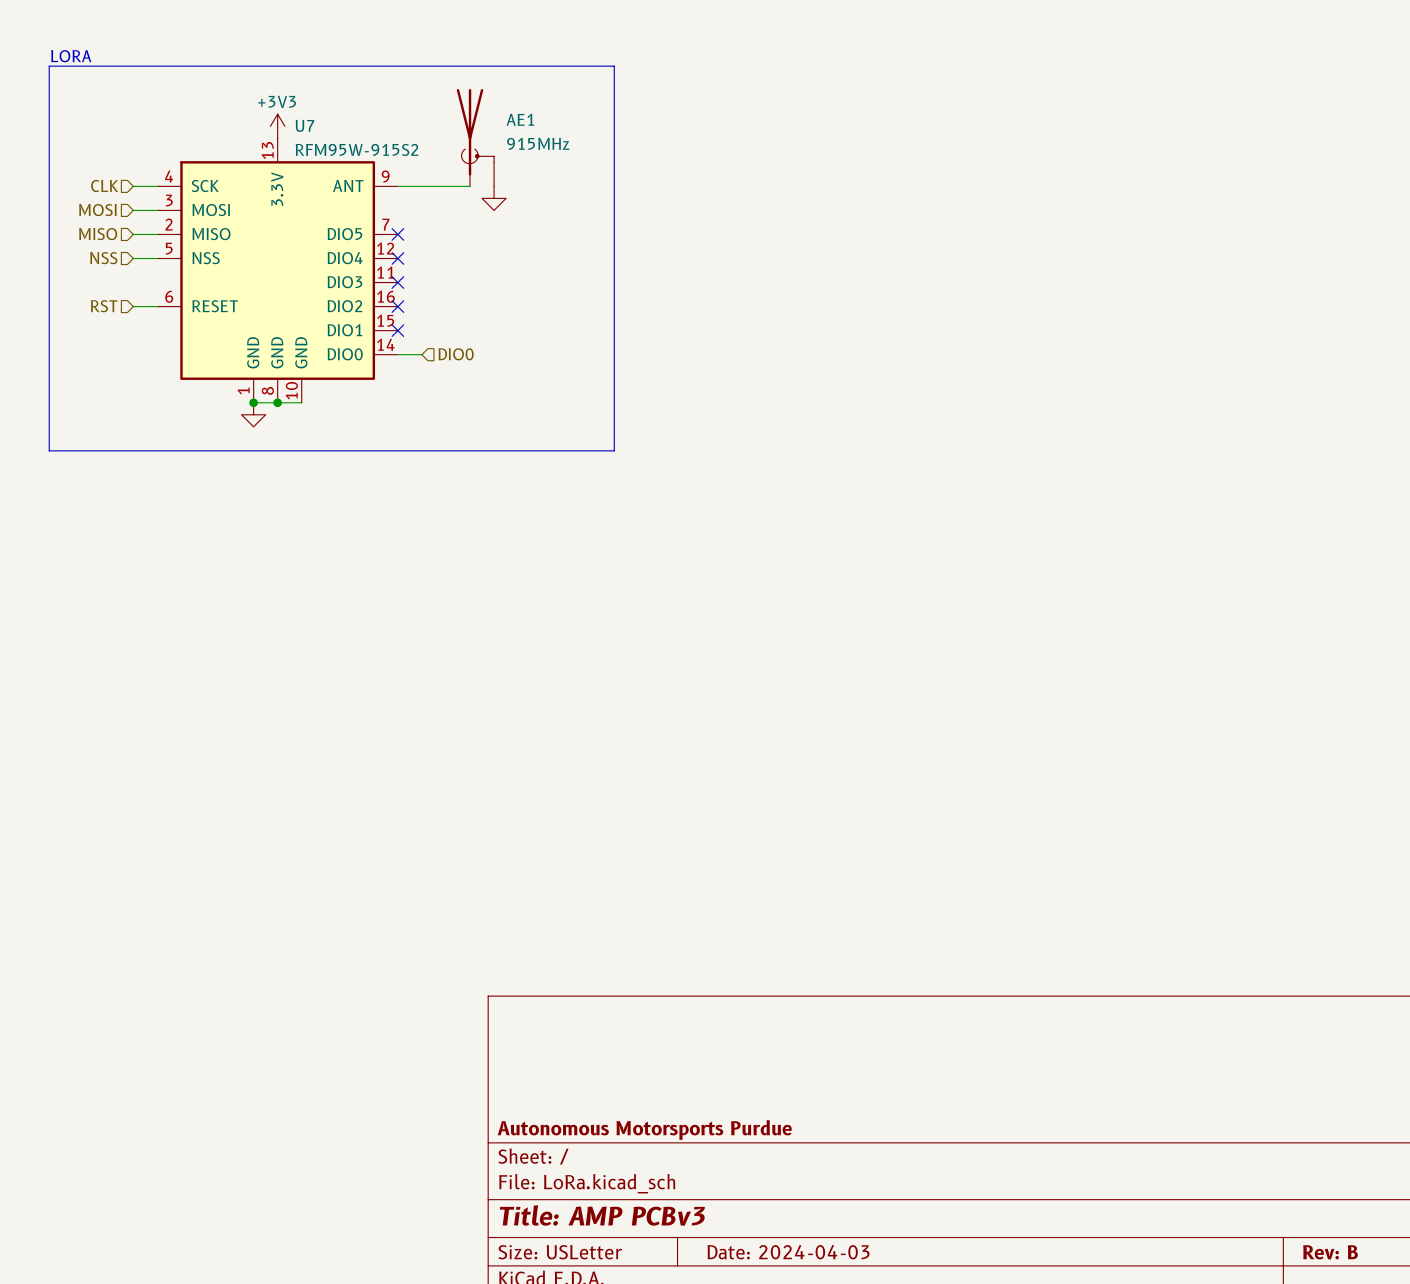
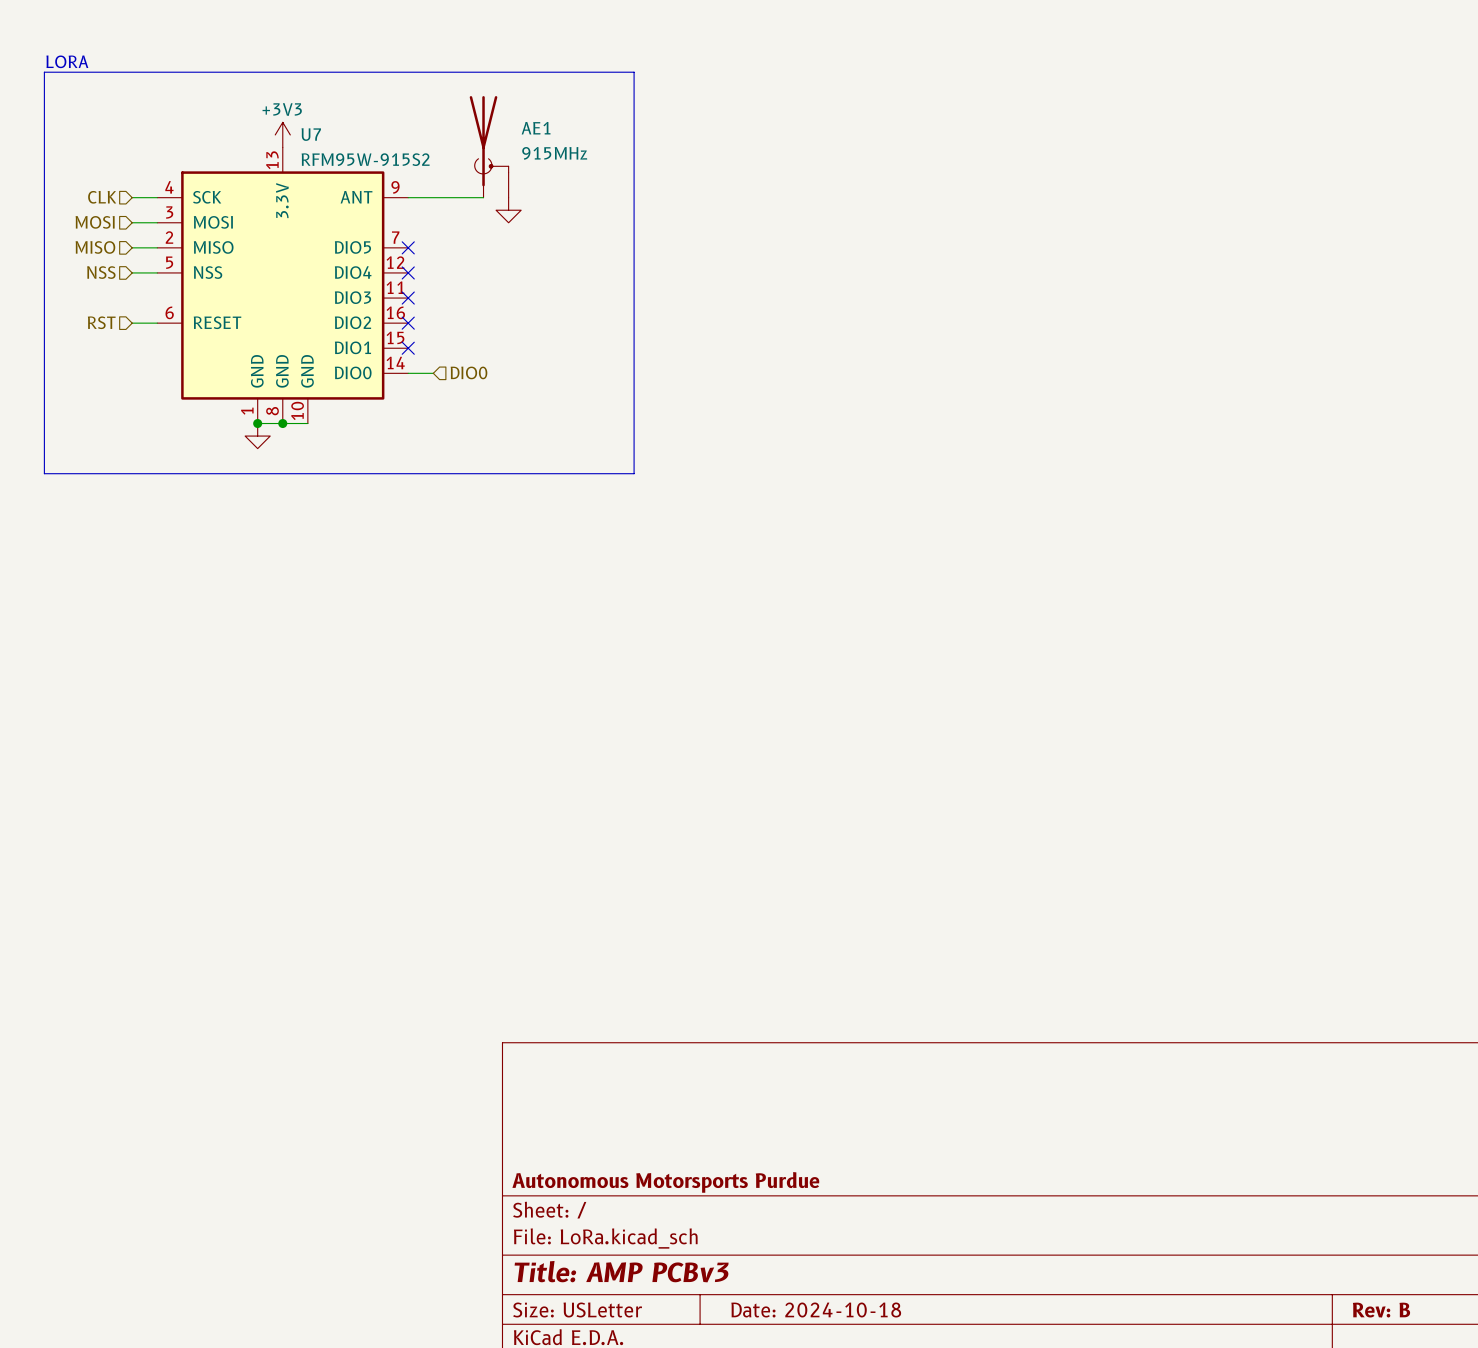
title block: Date: 2024-04-03 (788, 1252) -> Date: 2024-10-18 (816, 1309)

